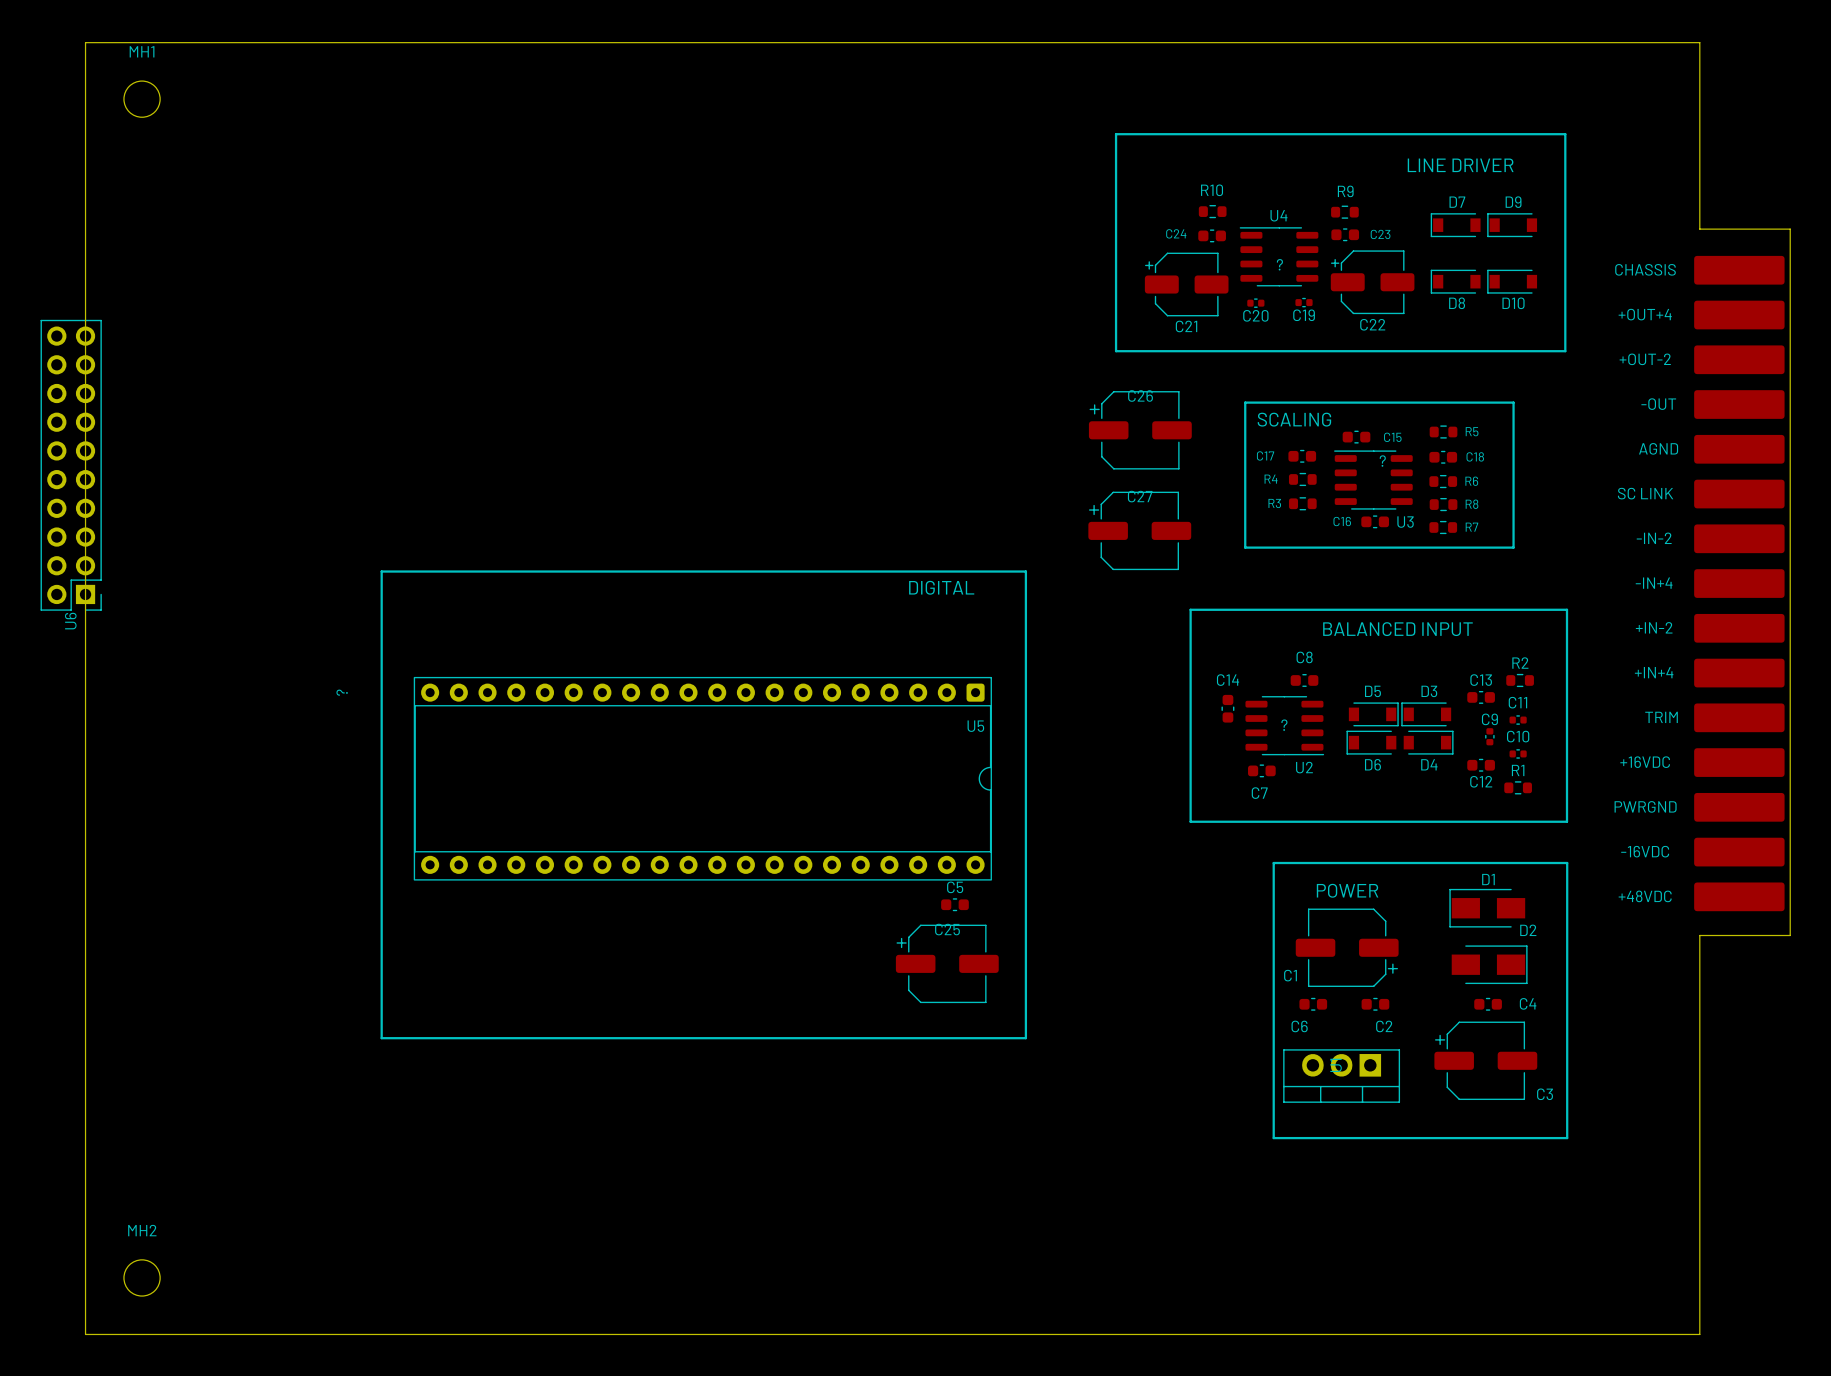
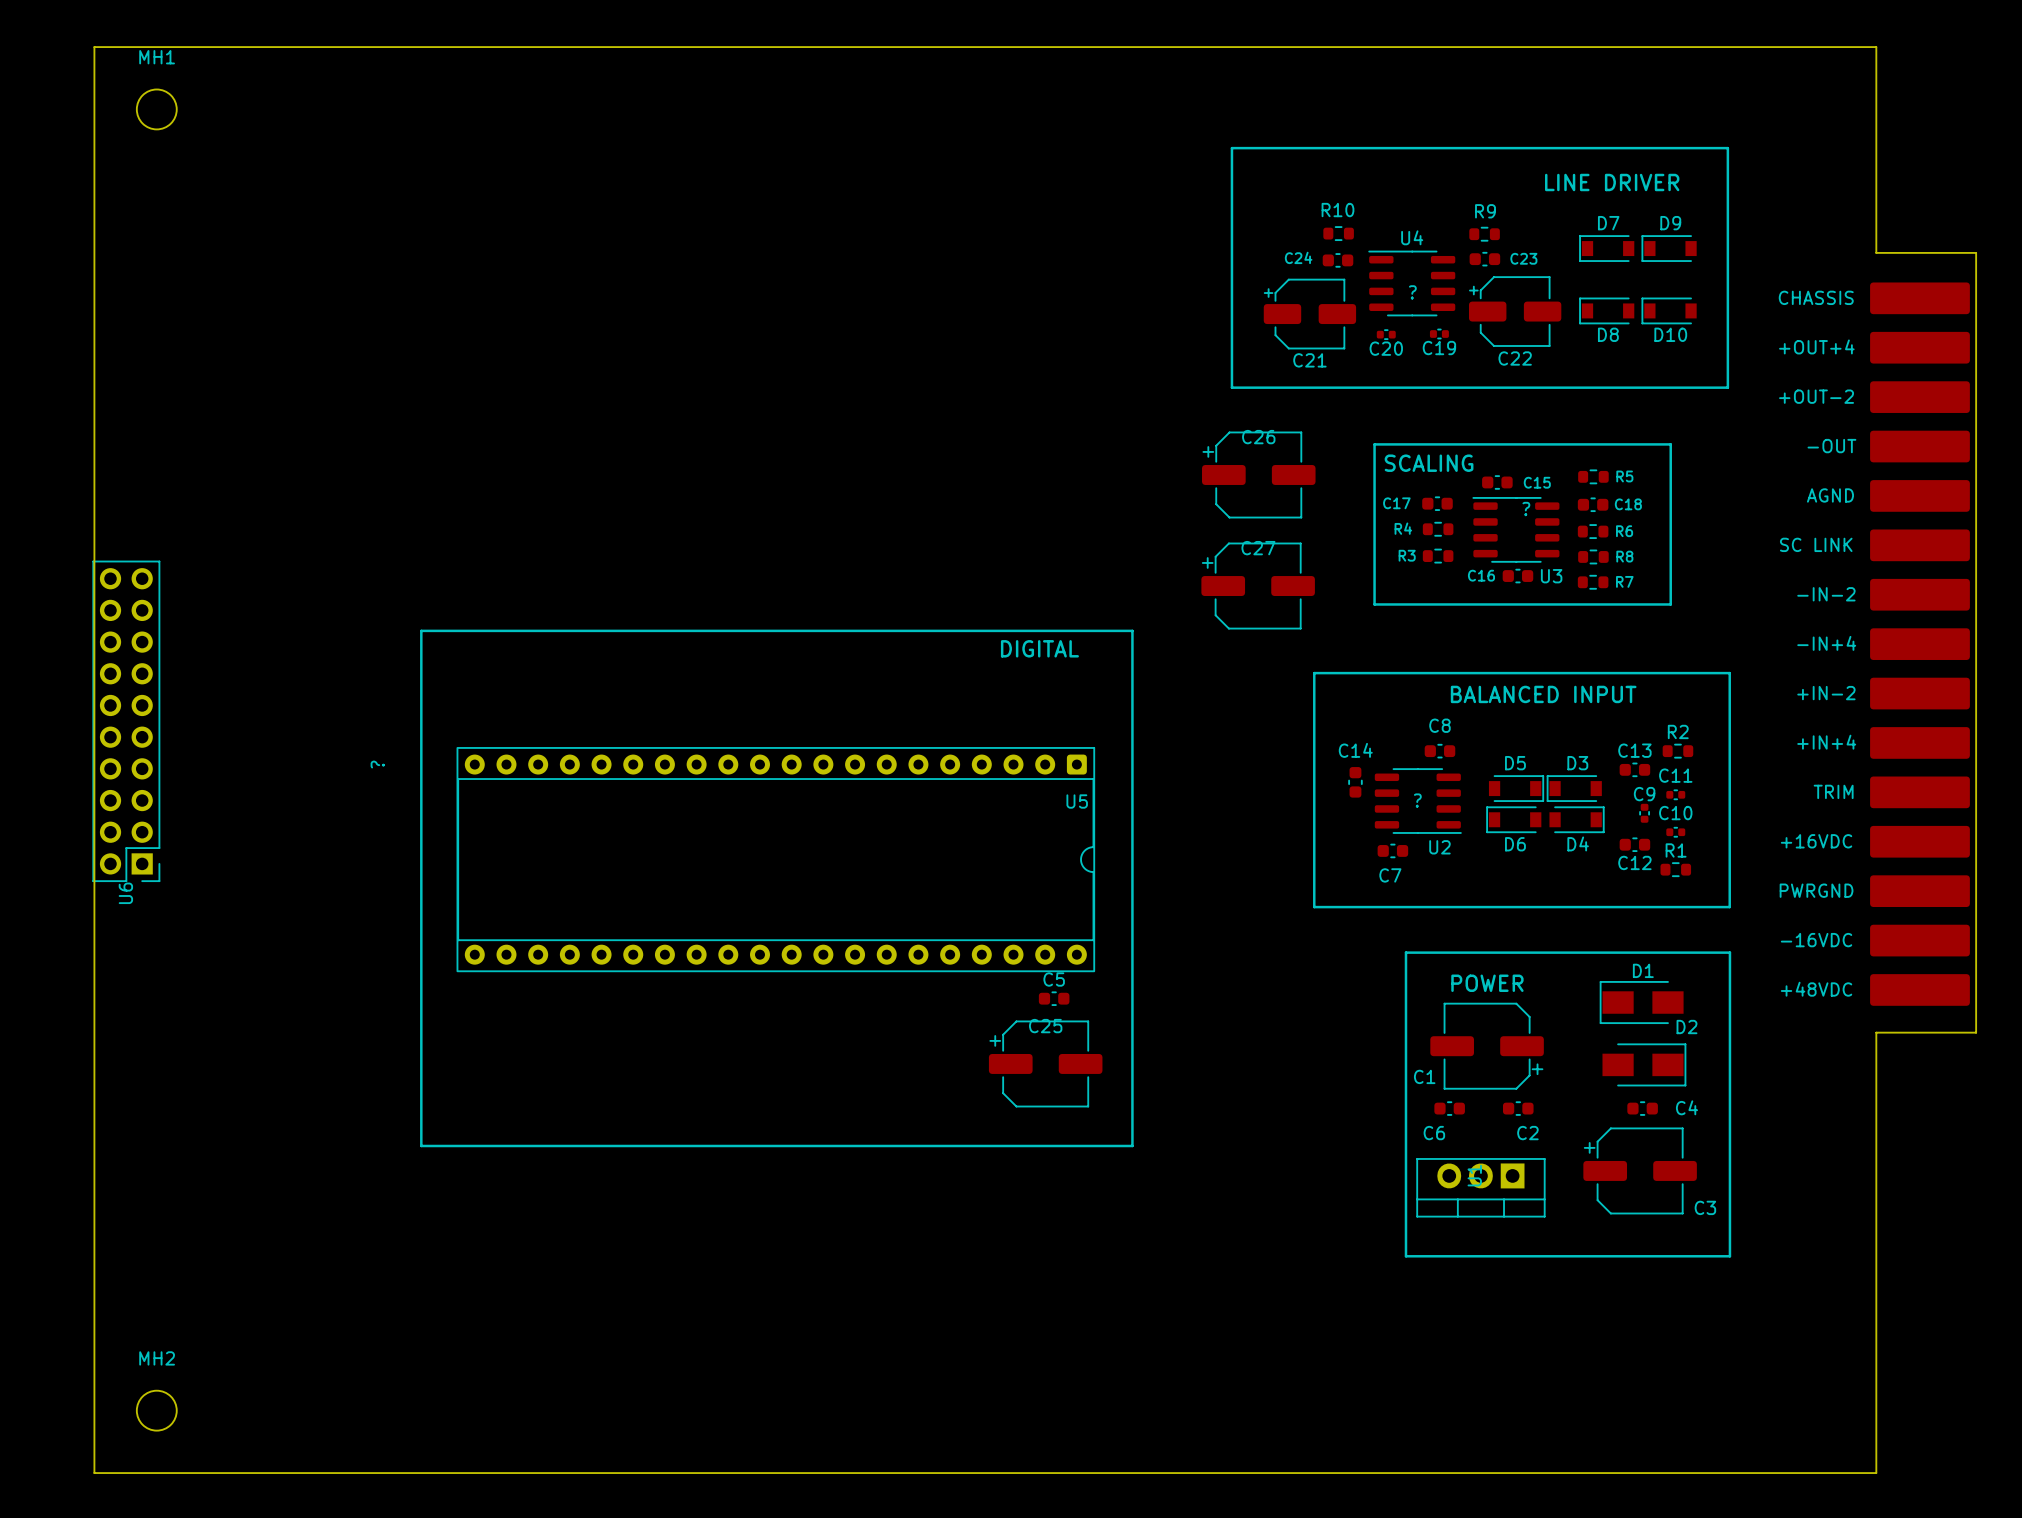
U6 position: (71, 465) -> (126, 721)

